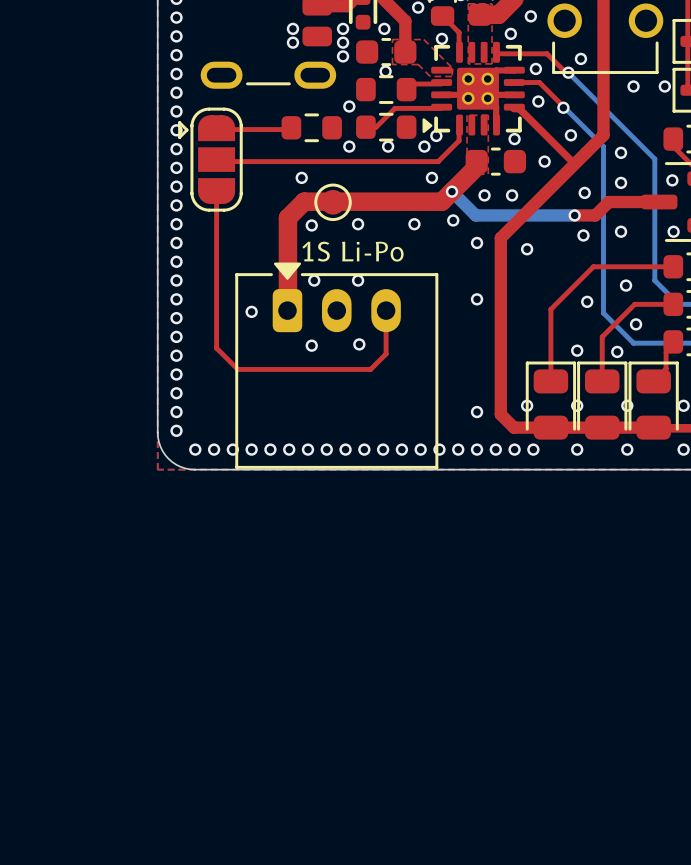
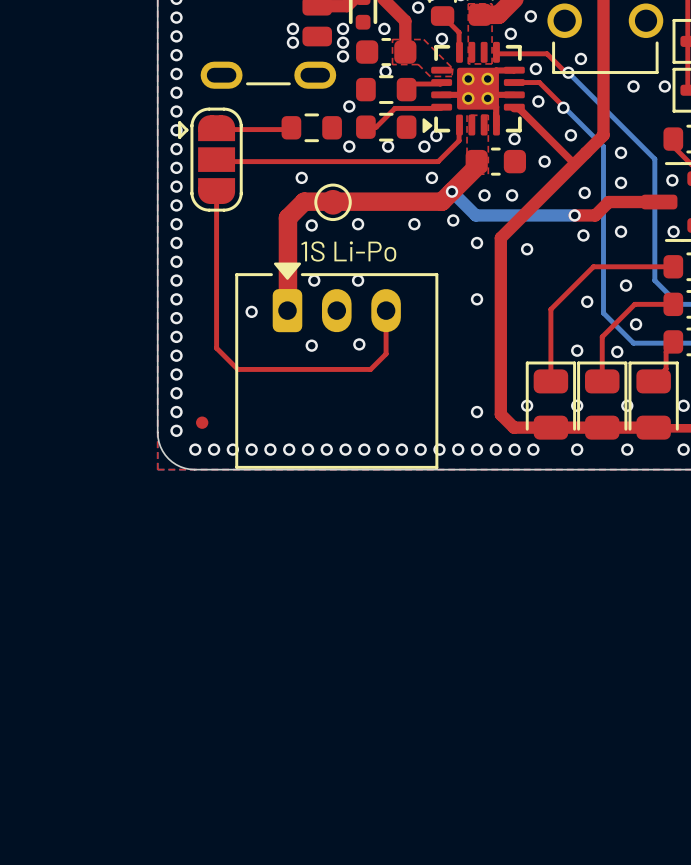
part: none -> (202, 422)

